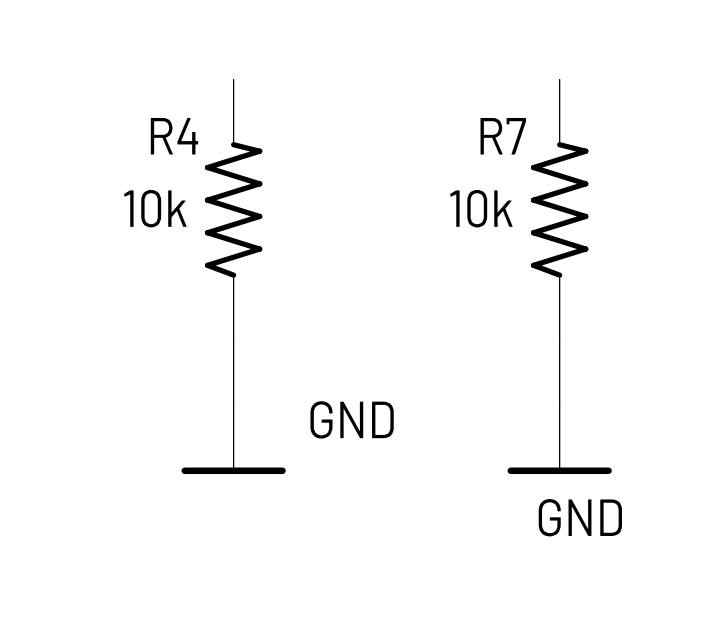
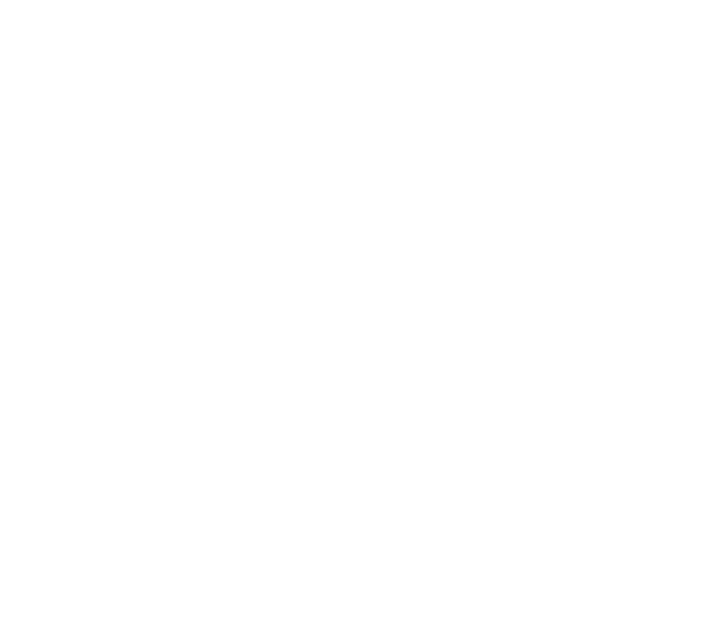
R4: 10k (233, 209) -> none
R7: 10k (559, 209) -> none
wire: (233, 340) (233, 405) -> none
wire: (559, 340) (559, 405) -> none
power symbol: GND (233, 439) -> none
power symbol: GND (559, 439) -> none

